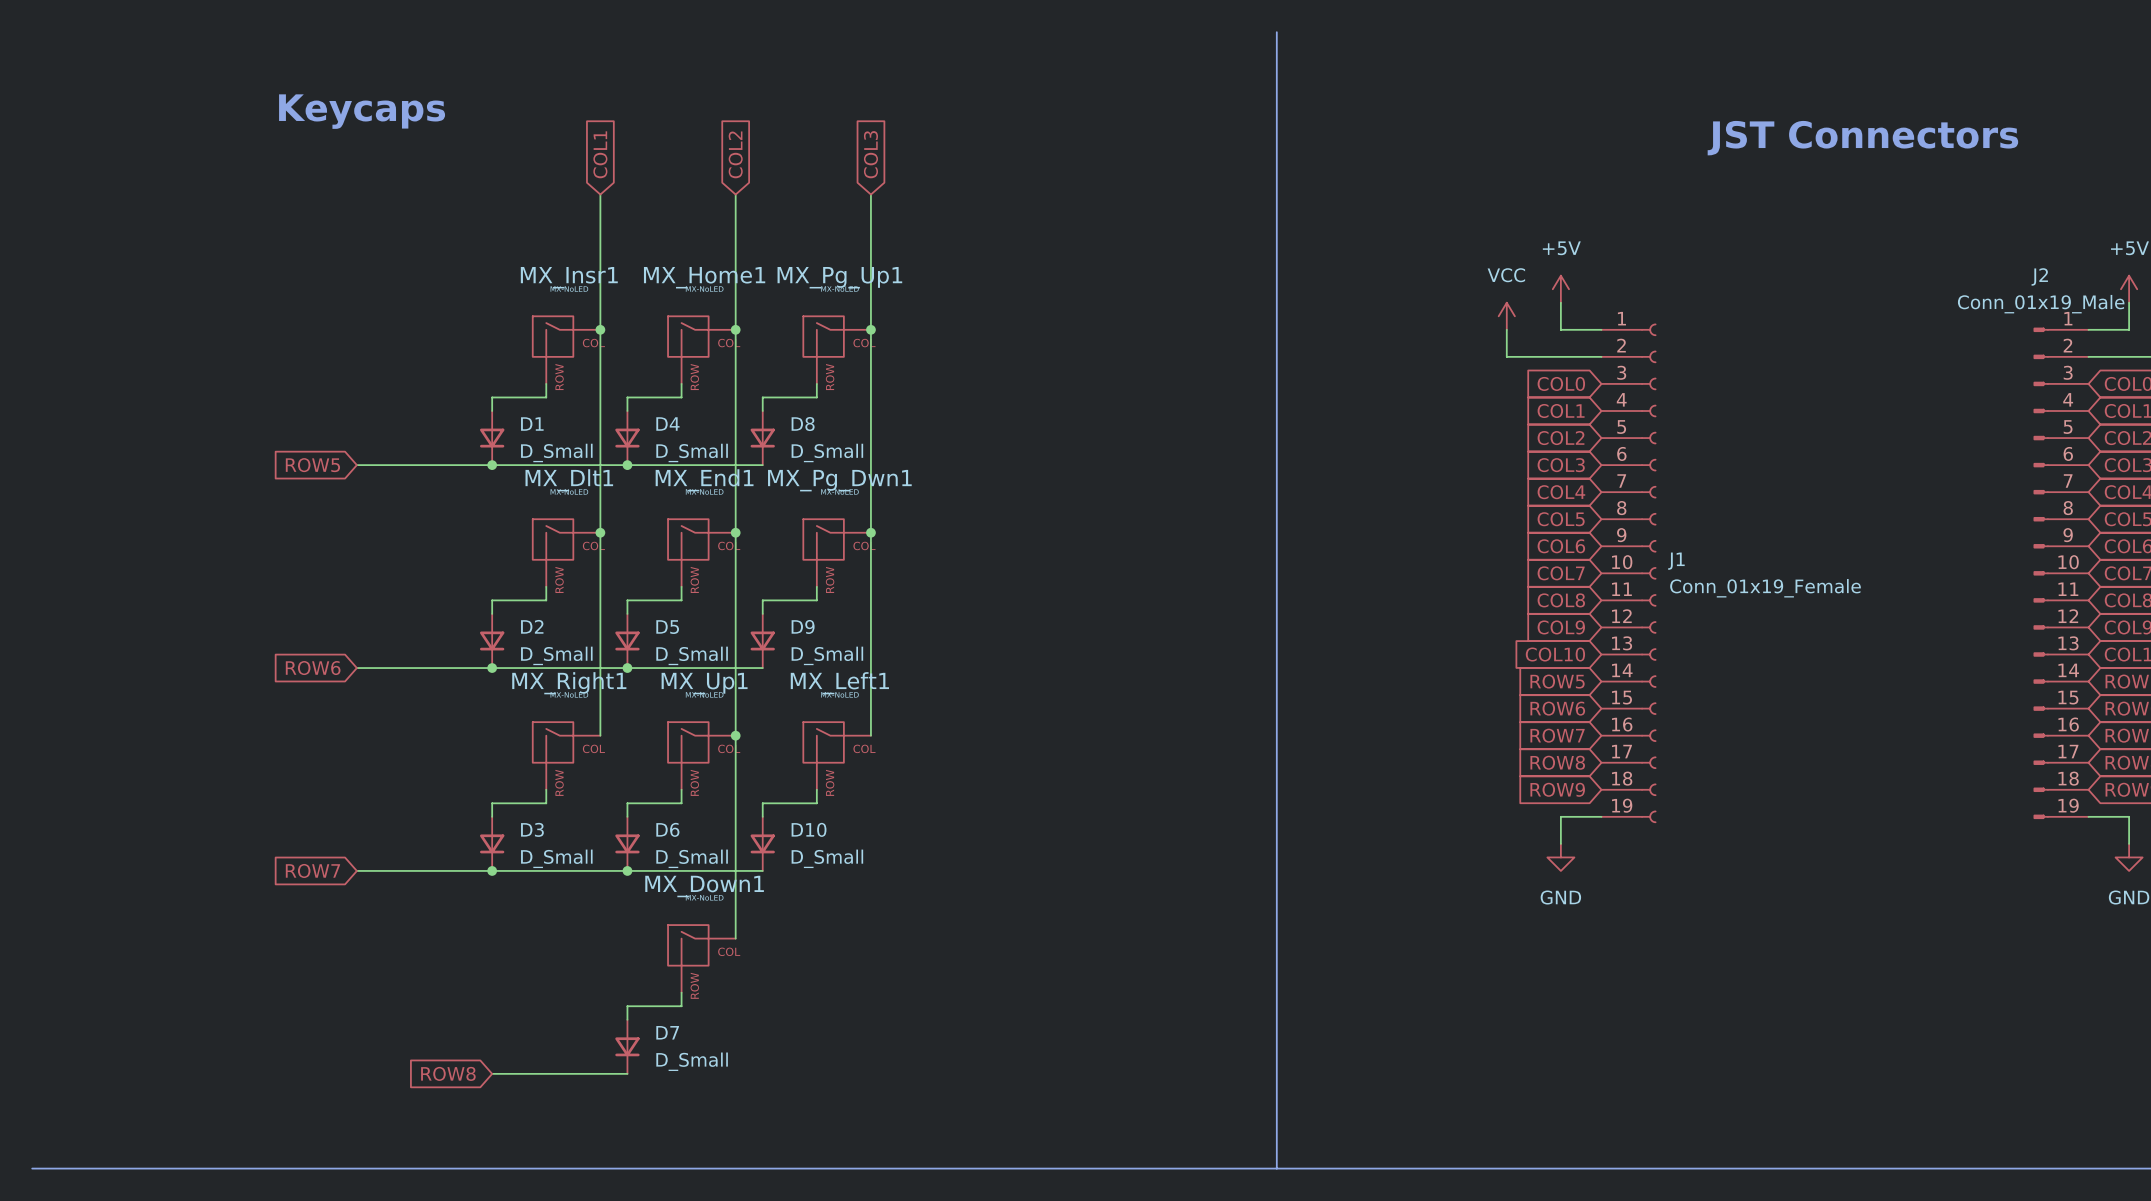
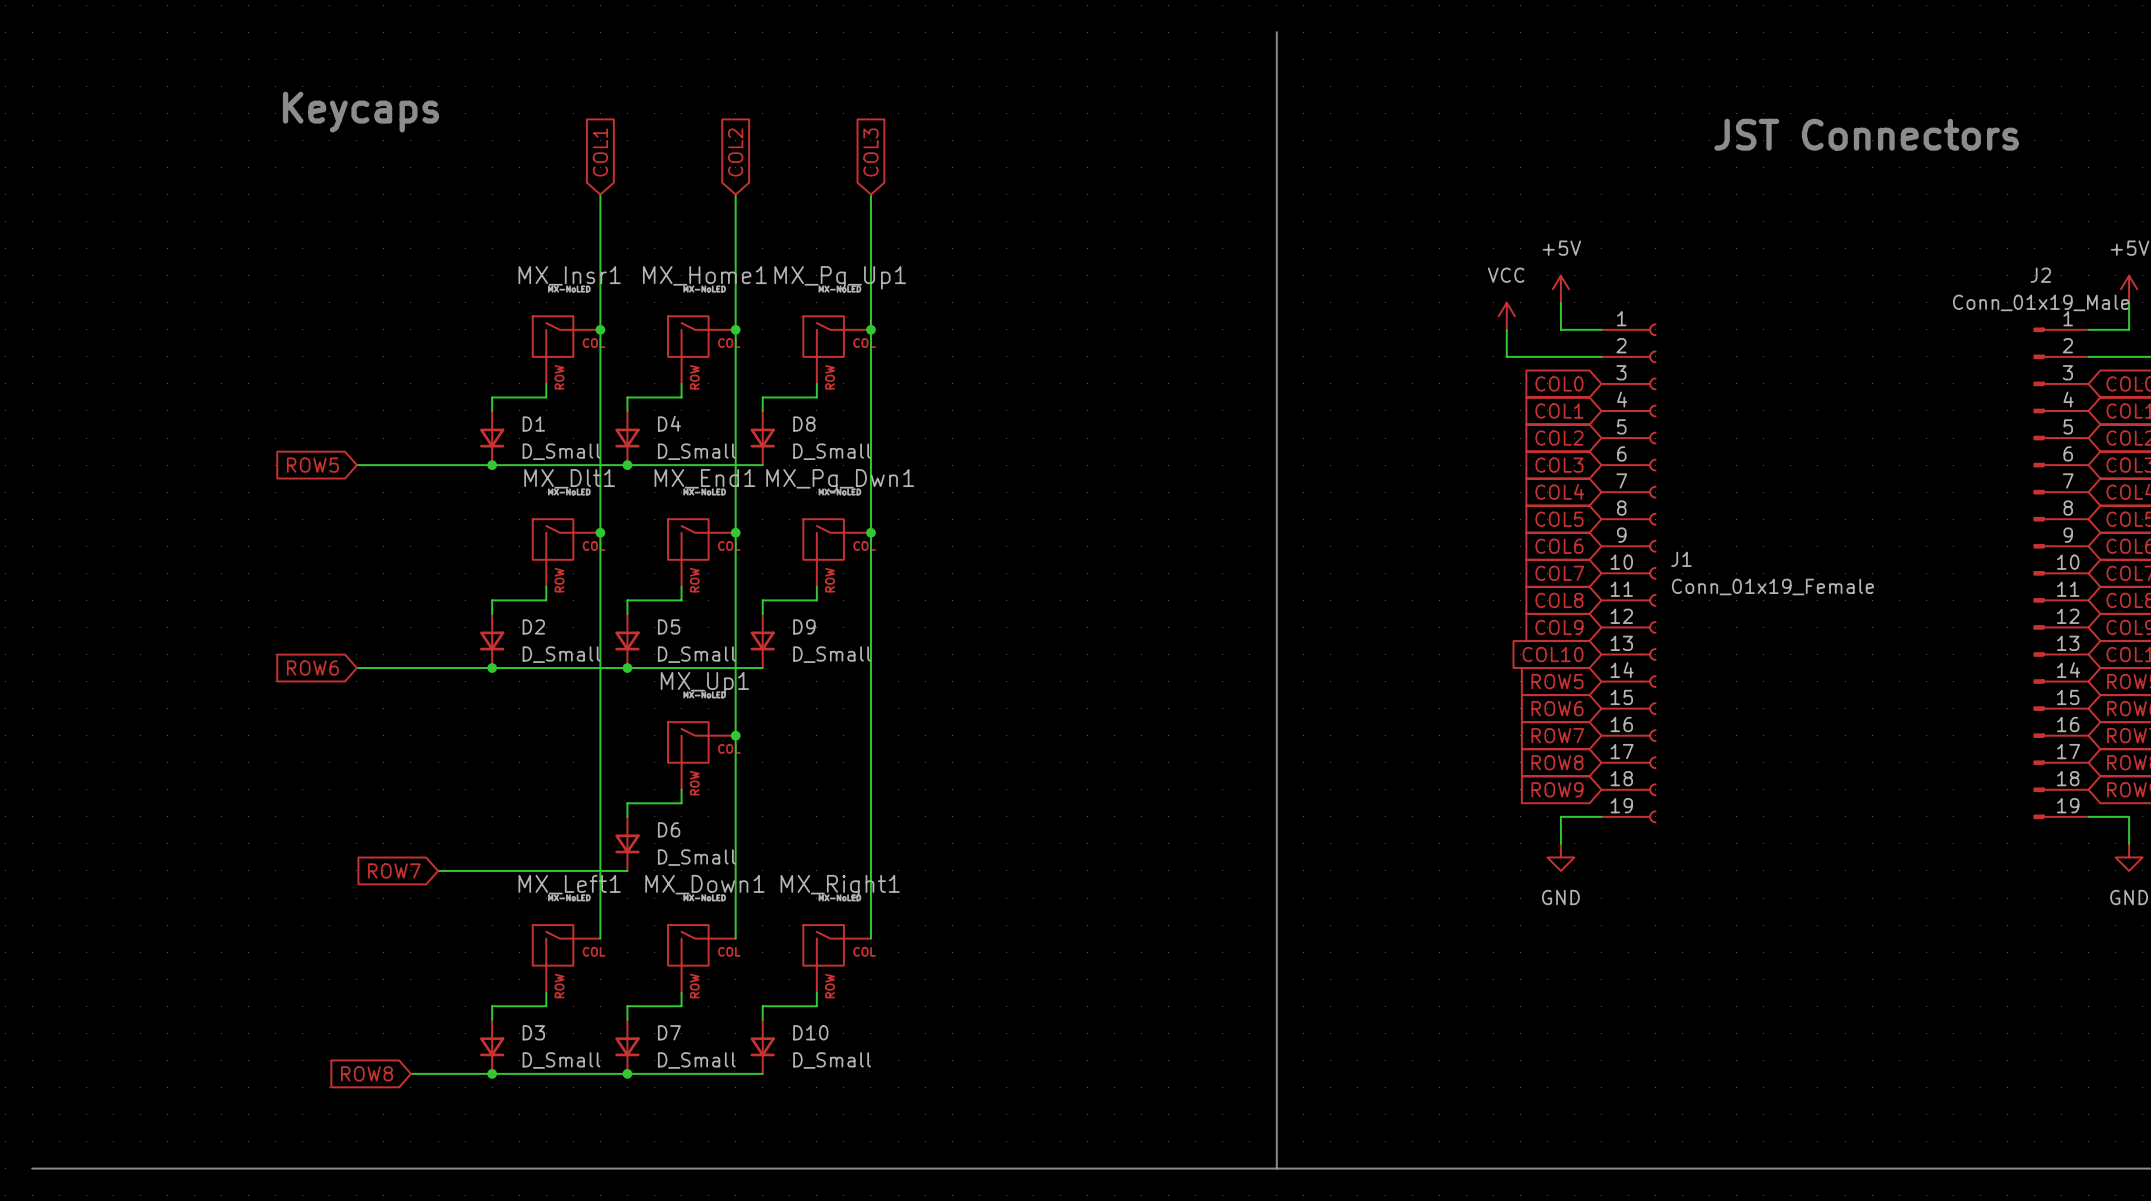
wire: none -> (600, 735) (600, 938)
wire: none -> (870, 735) (870, 938)
MX_Right1 position: (566, 755) -> (837, 958)
MX_Left1 position: (837, 755) -> (566, 958)
wire: (546, 789) (546, 803) (492, 803) (492, 816) -> (546, 992) (546, 1006) (492, 1006) (492, 1019)
wire: (816, 789) (816, 803) (762, 803) (762, 816) -> (816, 992) (816, 1006) (762, 1006) (762, 1019)
D3 position: (492, 843) -> (492, 1046)
D10 position: (762, 843) -> (762, 1046)
global label position: ROW7 (312, 870) -> ROW7 (394, 870)
wire: (356, 870) (438, 870) -> (410, 1073) (492, 1073)
junction: (492, 870) -> none
wire: (627, 870) (762, 870) -> (627, 1073) (762, 1073)
junction: (627, 870) -> none
global label position: ROW8 (448, 1073) -> ROW8 (367, 1073)
junction: none -> (492, 1073)
junction: none -> (627, 1073)

